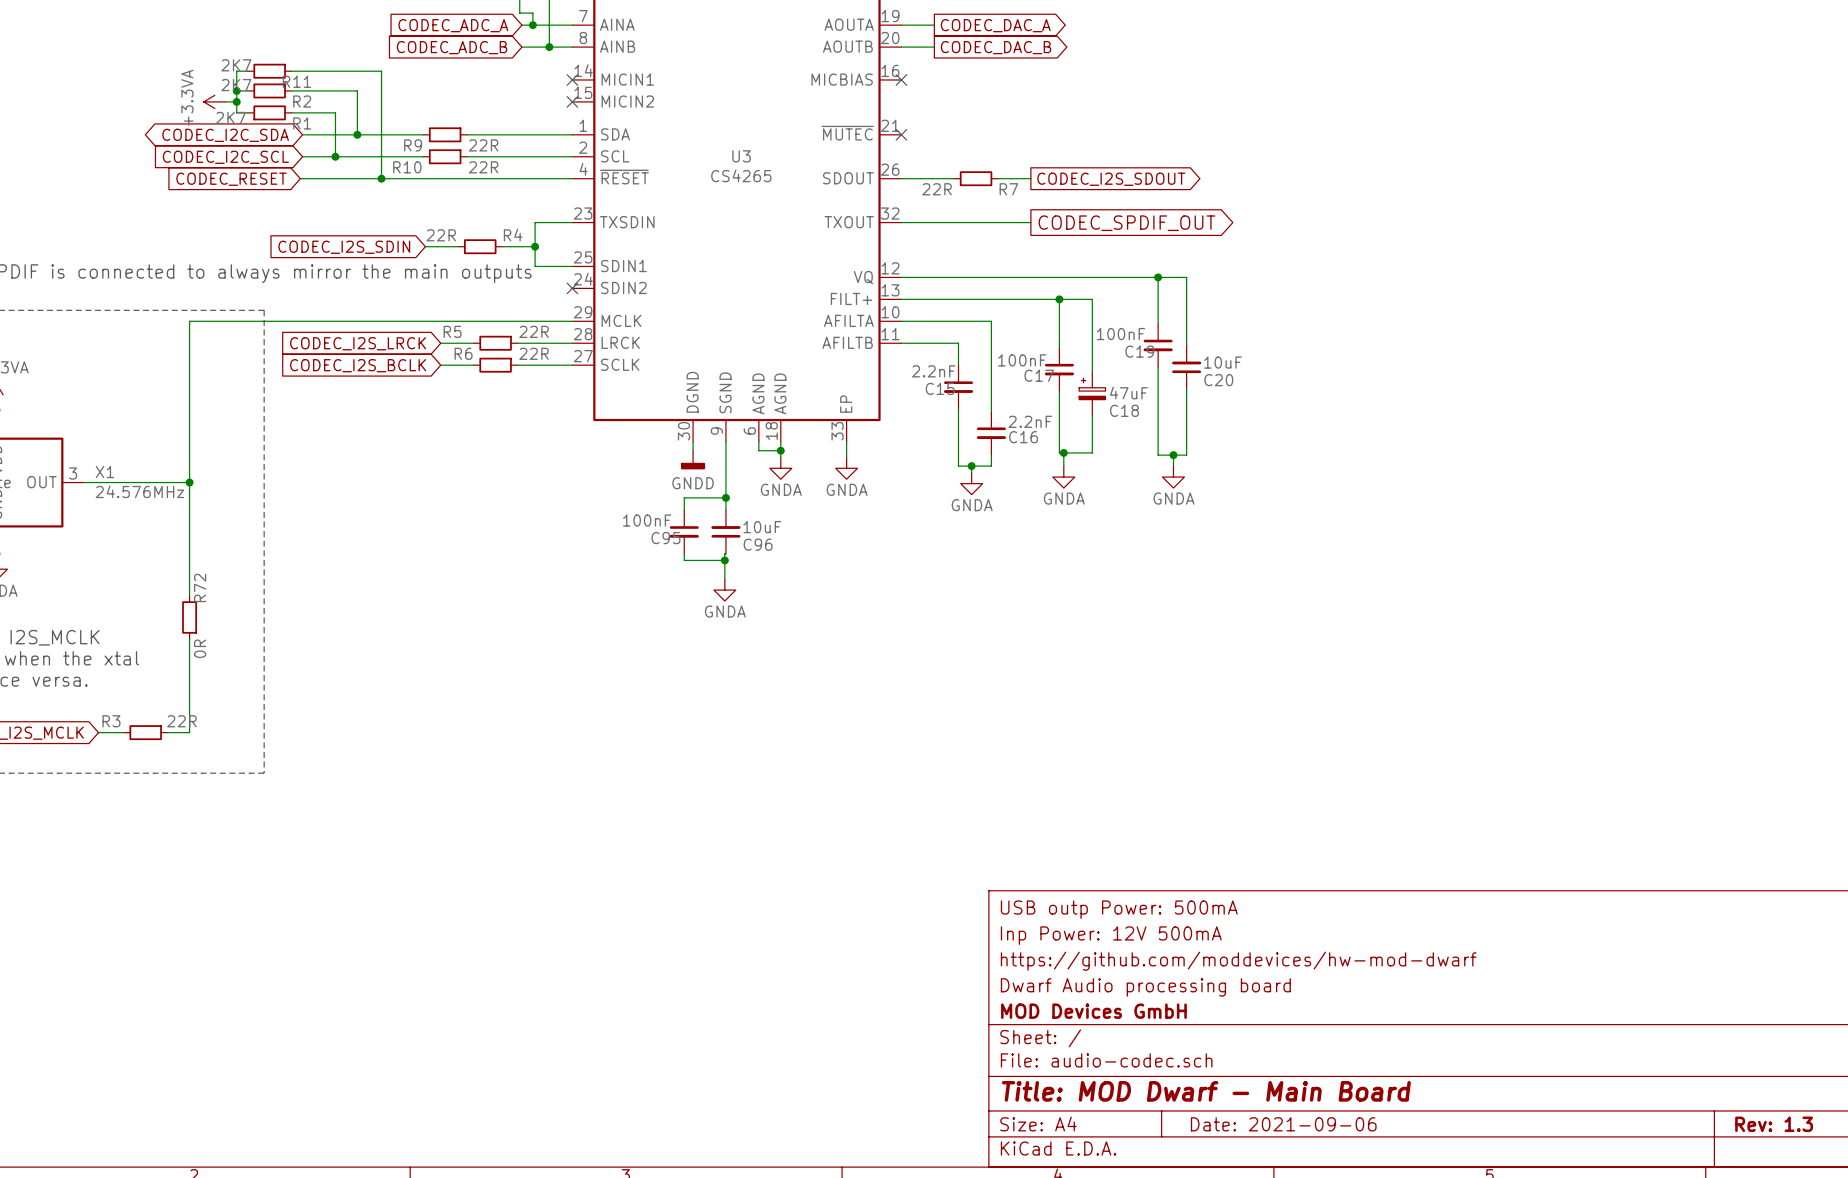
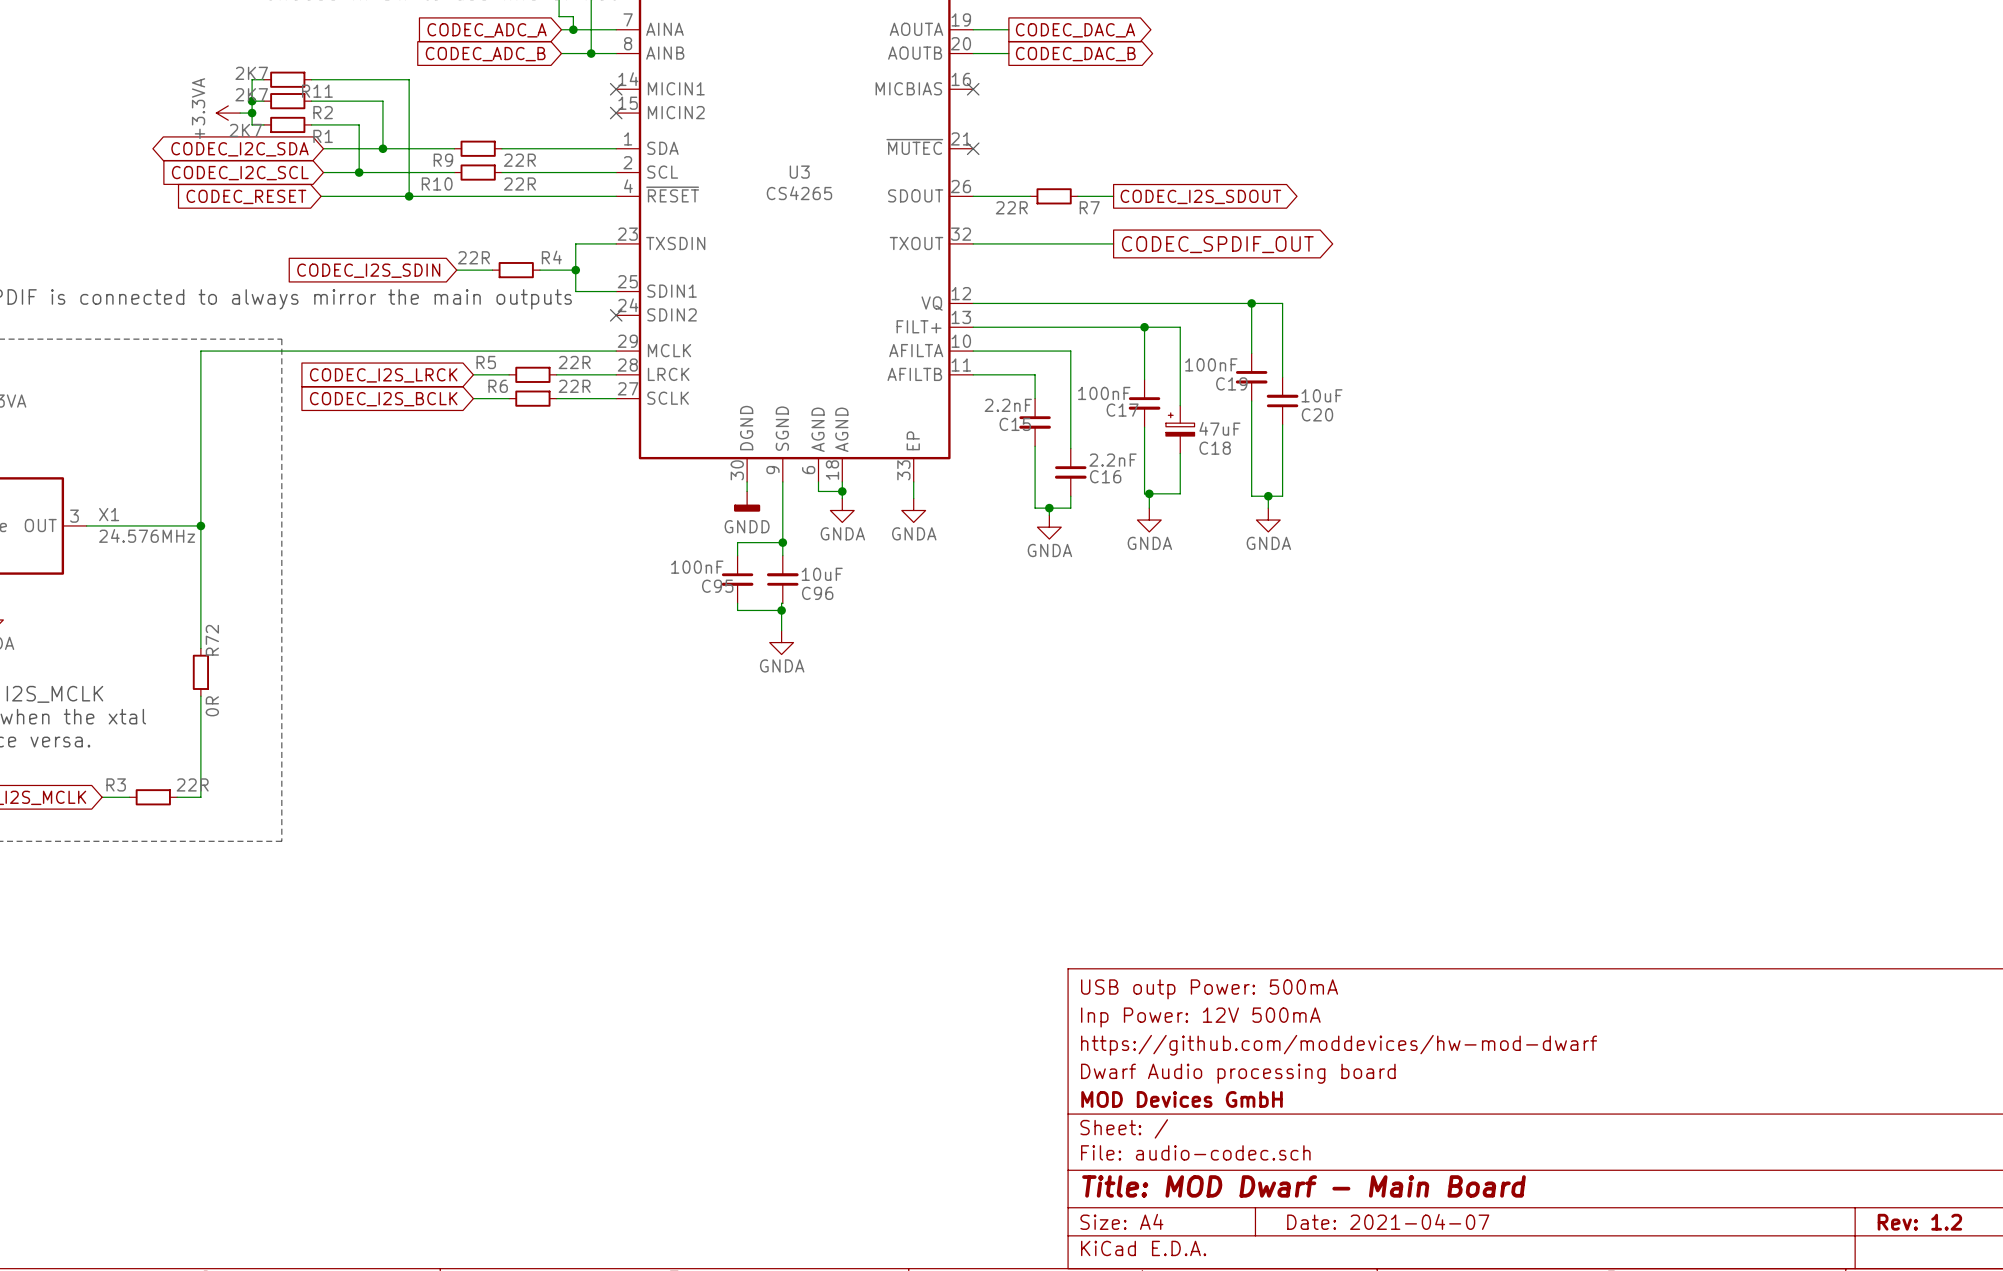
title block: Date: 2021-09-06 (1283, 1124) -> Date: 2021-04-07 (1388, 1221)
title block: Rev: 1.3 (1774, 1124) -> Rev: 1.2 (1919, 1222)

